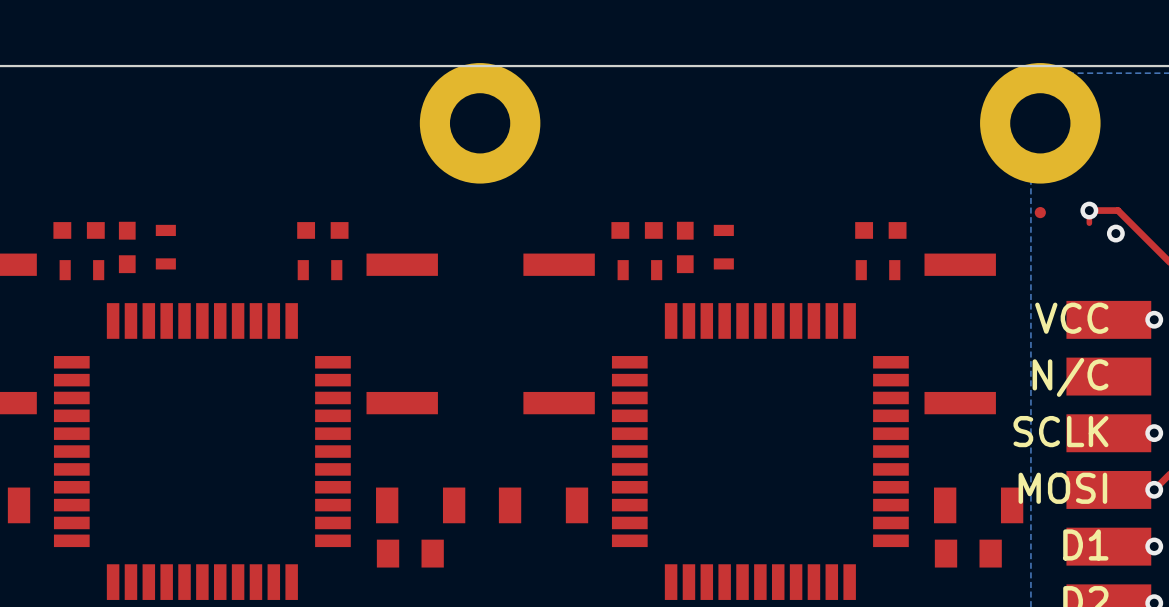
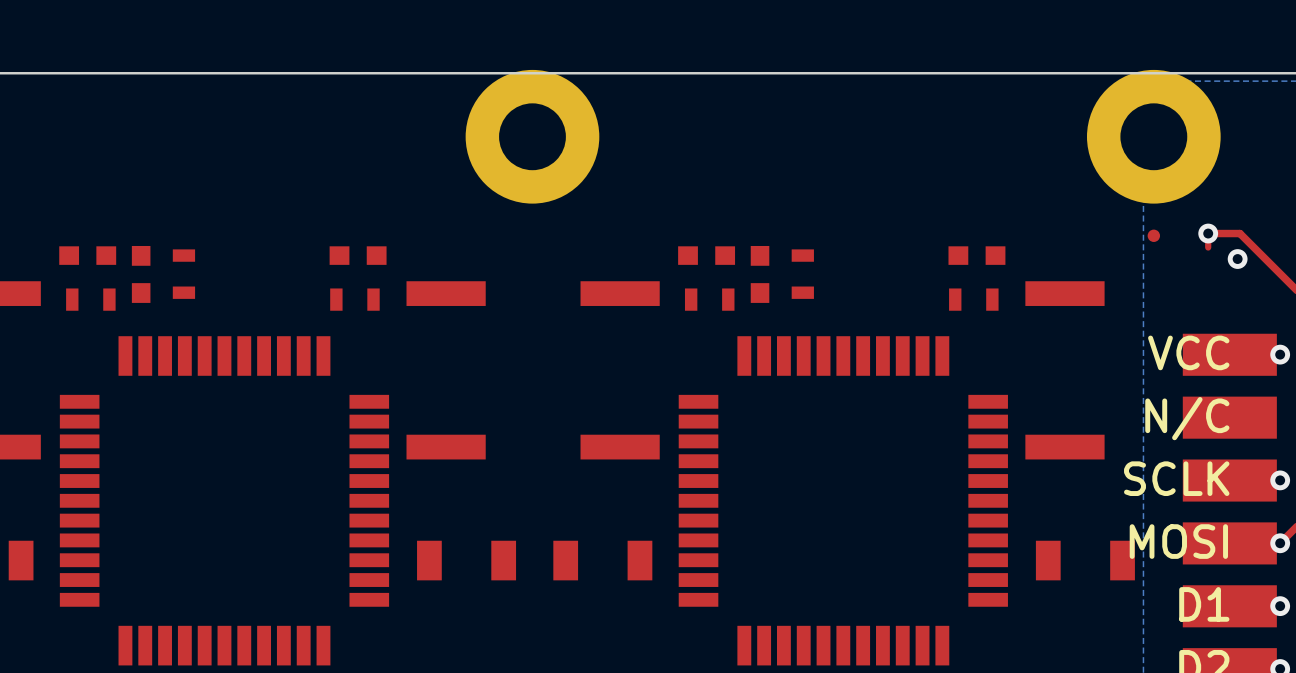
part: (410, 553) -> none
part: (968, 553) -> none

